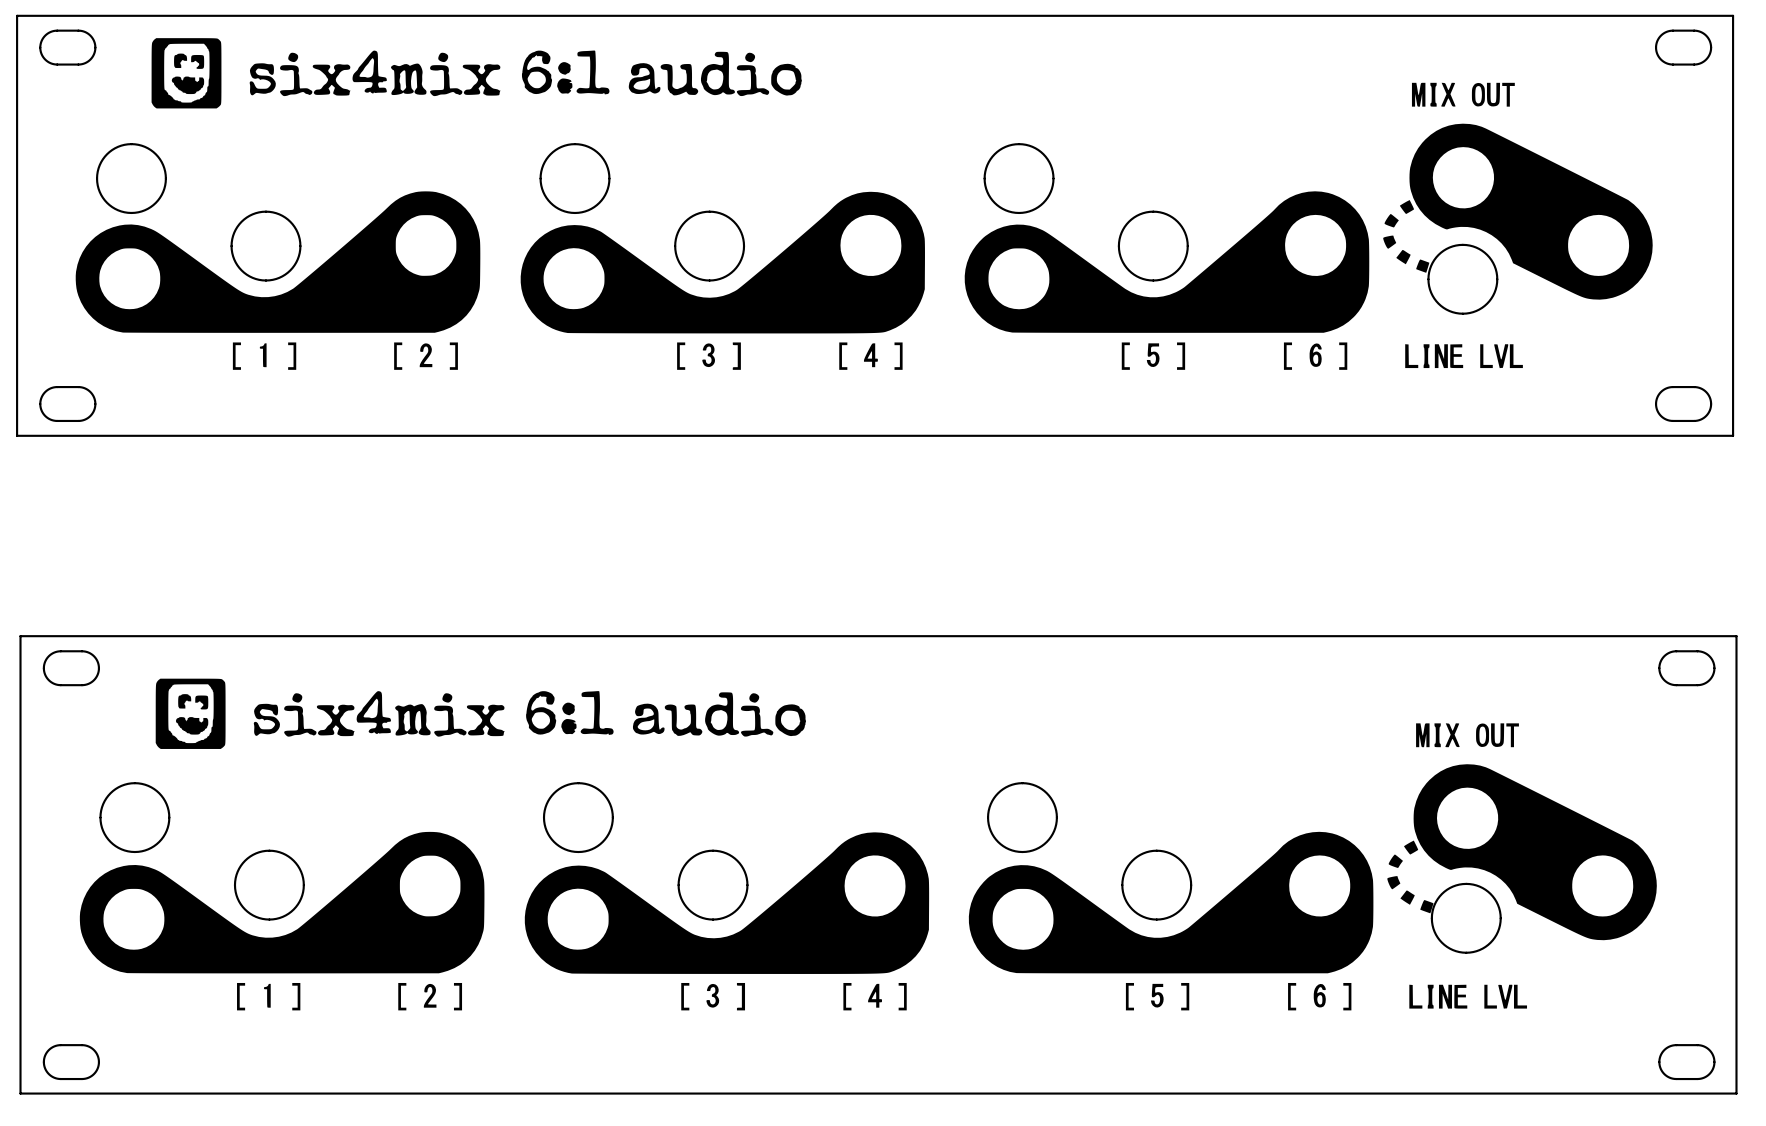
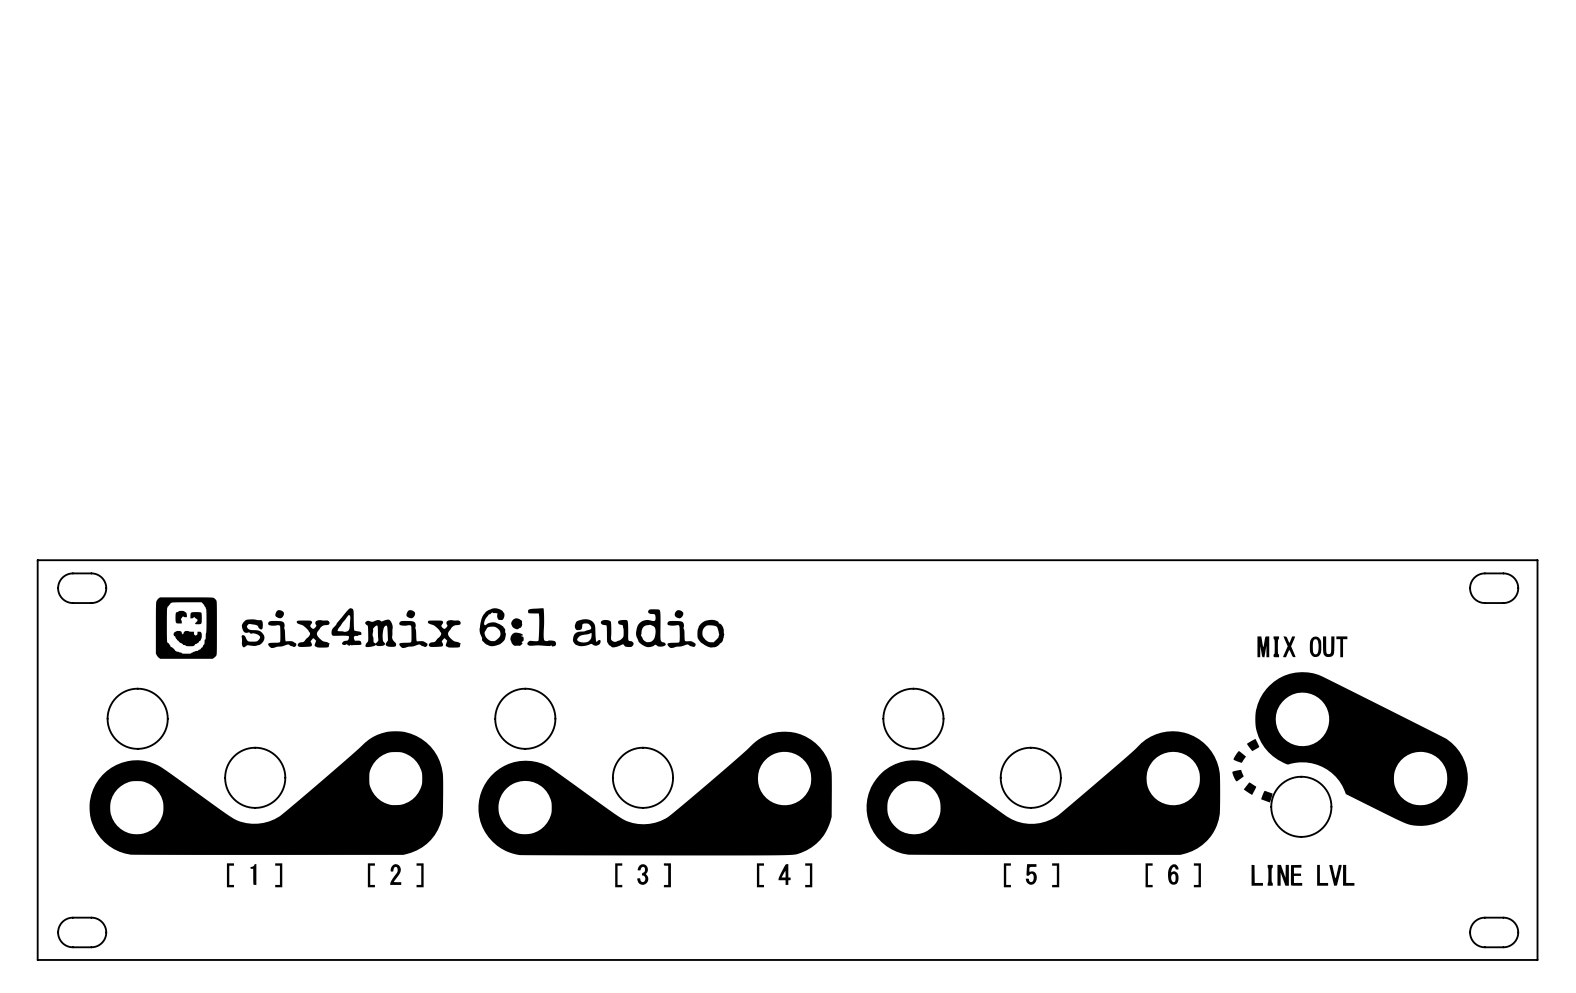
board edge: (17, 15) (17, 435) (1733, 435) (1733, 15) (17, 15) -> none
board edge: (57, 30) (47, 33) (41, 42) (41, 52) (46, 60) (55, 64) (80, 64) (91, 58) (95, 45) (89, 34) (80, 30) (57, 30) -> none
board edge: (1672, 30) (1663, 33) (1656, 42) (1656, 52) (1662, 60) (1671, 64) (1695, 64) (1707, 58) (1711, 45) (1704, 34) (1695, 30) (1672, 30) -> none
drawing: [75, 38, 1653, 370] -> none
board edge: (131, 144) (118, 146) (107, 154) (99, 165) (97, 178) (99, 191) (107, 202) (118, 210) (131, 212) (144, 210) (155, 202) (163, 191) (165, 178) (163, 165) (155, 154) (144, 146) (131, 144) -> none
board edge: (575, 144) (561, 146) (550, 154) (543, 165) (540, 178) (543, 191) (550, 202) (561, 210) (575, 212) (588, 210) (599, 202) (606, 191) (609, 178) (606, 165) (599, 154) (588, 146) (575, 144) -> none
board edge: (1019, 144) (1005, 146) (994, 154) (987, 165) (984, 178) (987, 191) (994, 202) (1005, 210) (1019, 212) (1032, 210) (1043, 202) (1050, 191) (1053, 178) (1050, 165) (1043, 154) (1032, 146) (1019, 144) -> none
board edge: (265, 211) (279, 214) (290, 221) (297, 232) (300, 246) (297, 259) (290, 270) (279, 277) (265, 280) (252, 277) (241, 270) (234, 259) (231, 246) (234, 232) (241, 221) (252, 214) (265, 211) -> none
board edge: (709, 211) (723, 214) (733, 221) (741, 232) (744, 246) (741, 259) (733, 270) (723, 277) (709, 280) (696, 277) (685, 270) (677, 259) (675, 246) (677, 232) (685, 221) (696, 214) (709, 211) -> none
board edge: (1153, 211) (1166, 214) (1177, 221) (1185, 232) (1187, 246) (1185, 259) (1177, 270) (1166, 277) (1153, 280) (1139, 277) (1128, 270) (1121, 259) (1118, 246) (1121, 232) (1128, 221) (1139, 214) (1153, 211) -> none
board edge: (1462, 244) (1449, 247) (1438, 254) (1431, 265) (1428, 279) (1431, 292) (1438, 303) (1449, 311) (1462, 313) (1476, 311) (1487, 303) (1494, 292) (1497, 279) (1494, 265) (1487, 254) (1476, 247) (1462, 244) -> none
board edge: (57, 387) (47, 389) (41, 398) (41, 409) (46, 417) (55, 420) (80, 420) (91, 414) (95, 402) (89, 390) (80, 387) (57, 387) -> none
board edge: (1672, 387) (1695, 387) (1704, 390) (1711, 402) (1707, 414) (1695, 420) (1671, 420) (1662, 417) (1656, 409) (1656, 398) (1663, 389) (1672, 387) -> none

